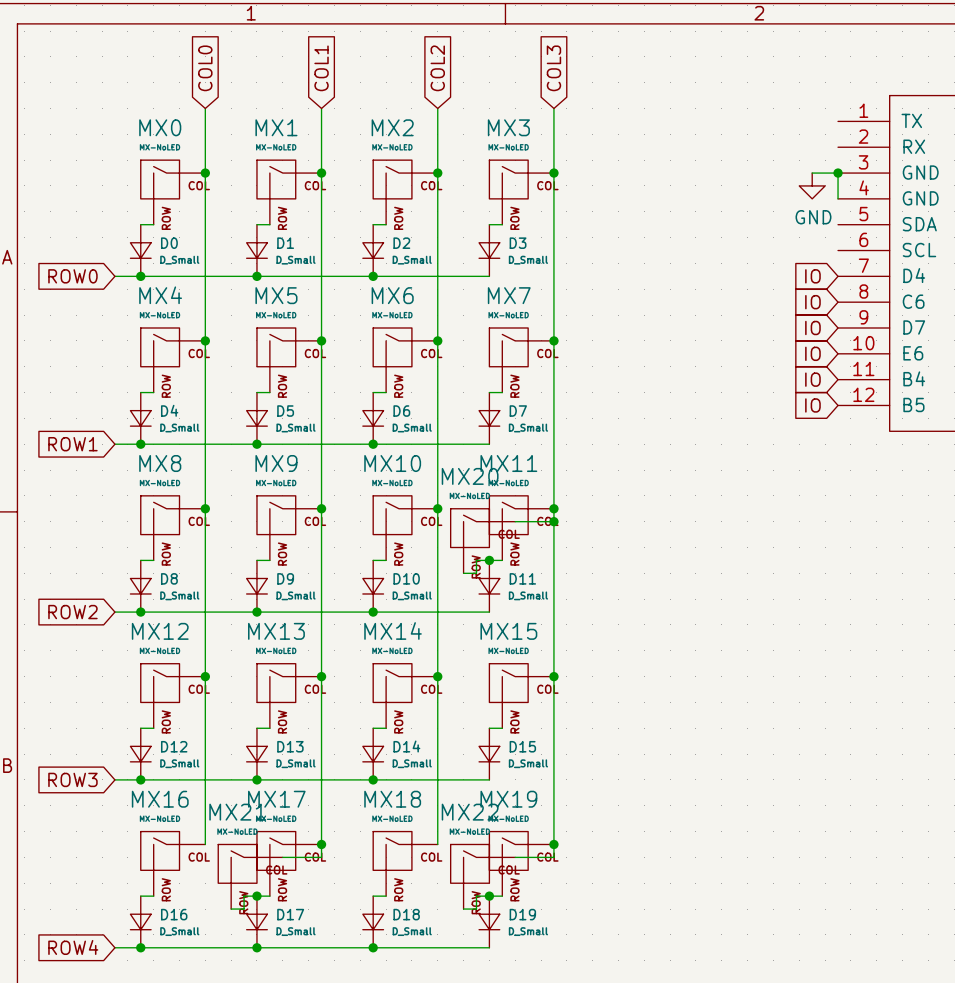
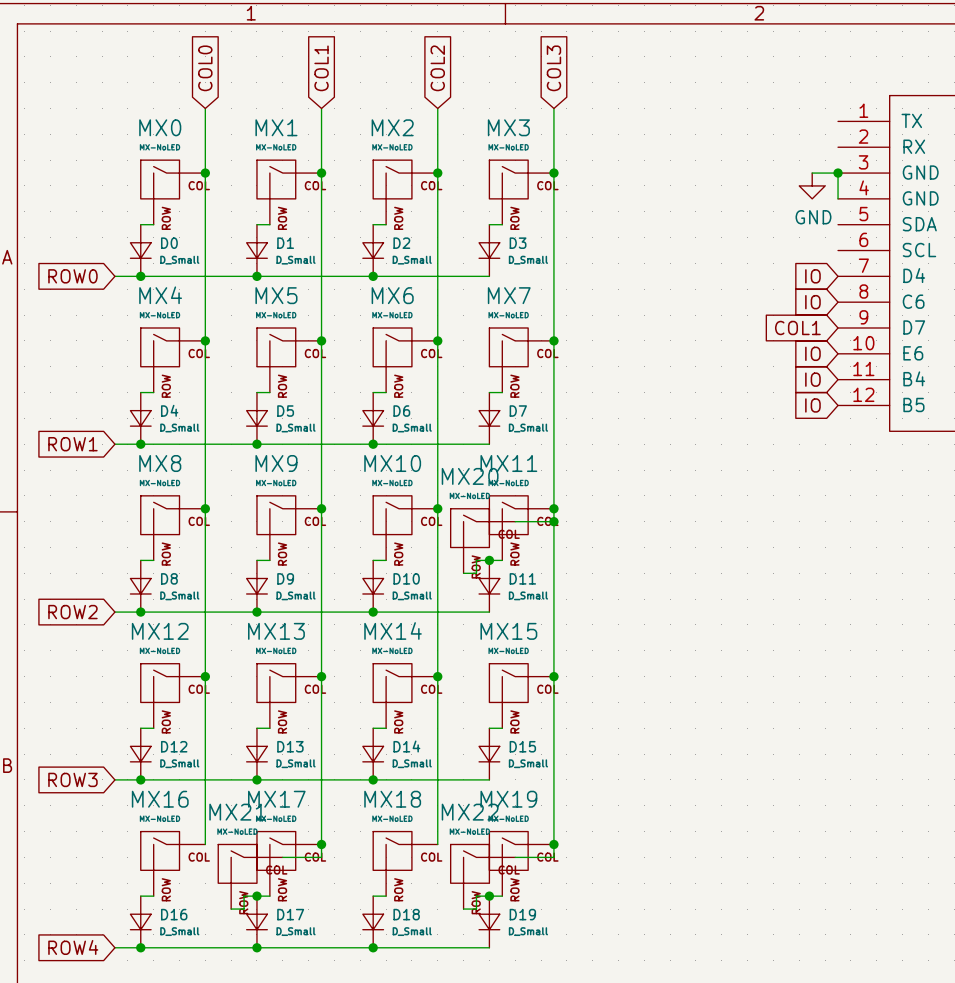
global label: IO (812, 327) -> COL1 (797, 327)

